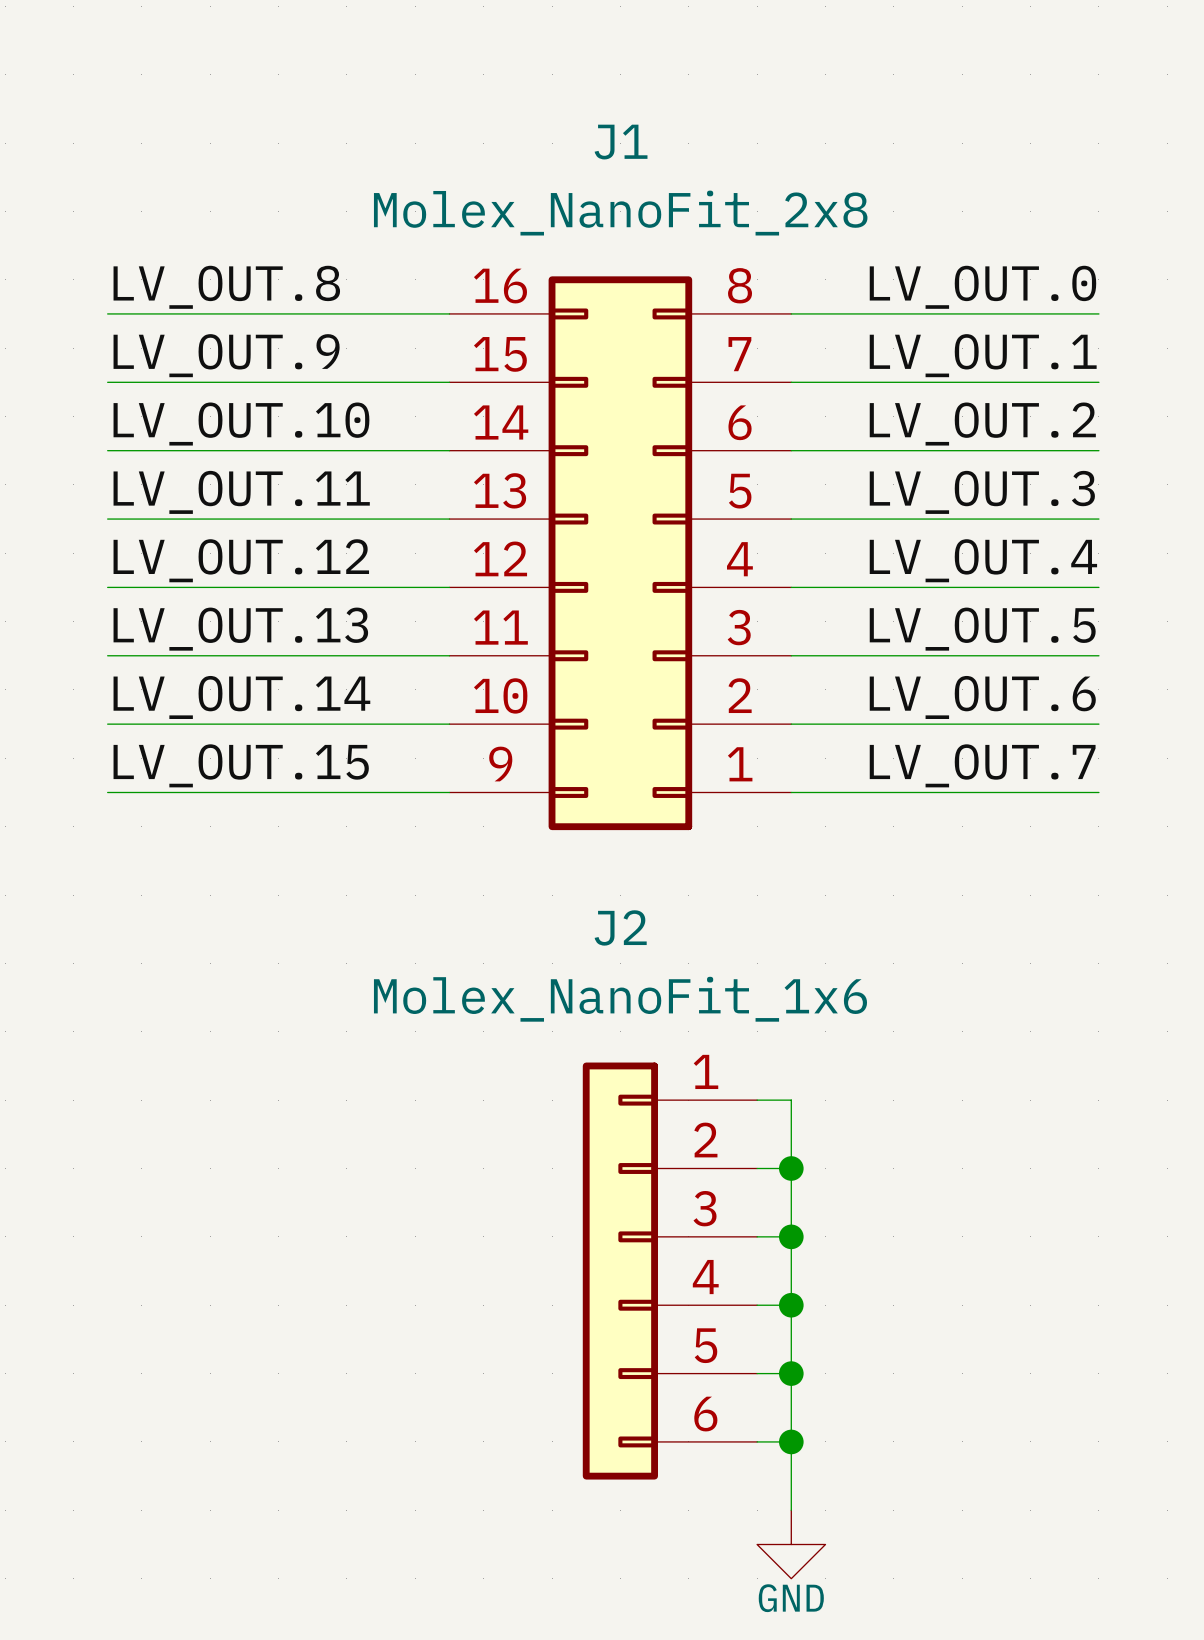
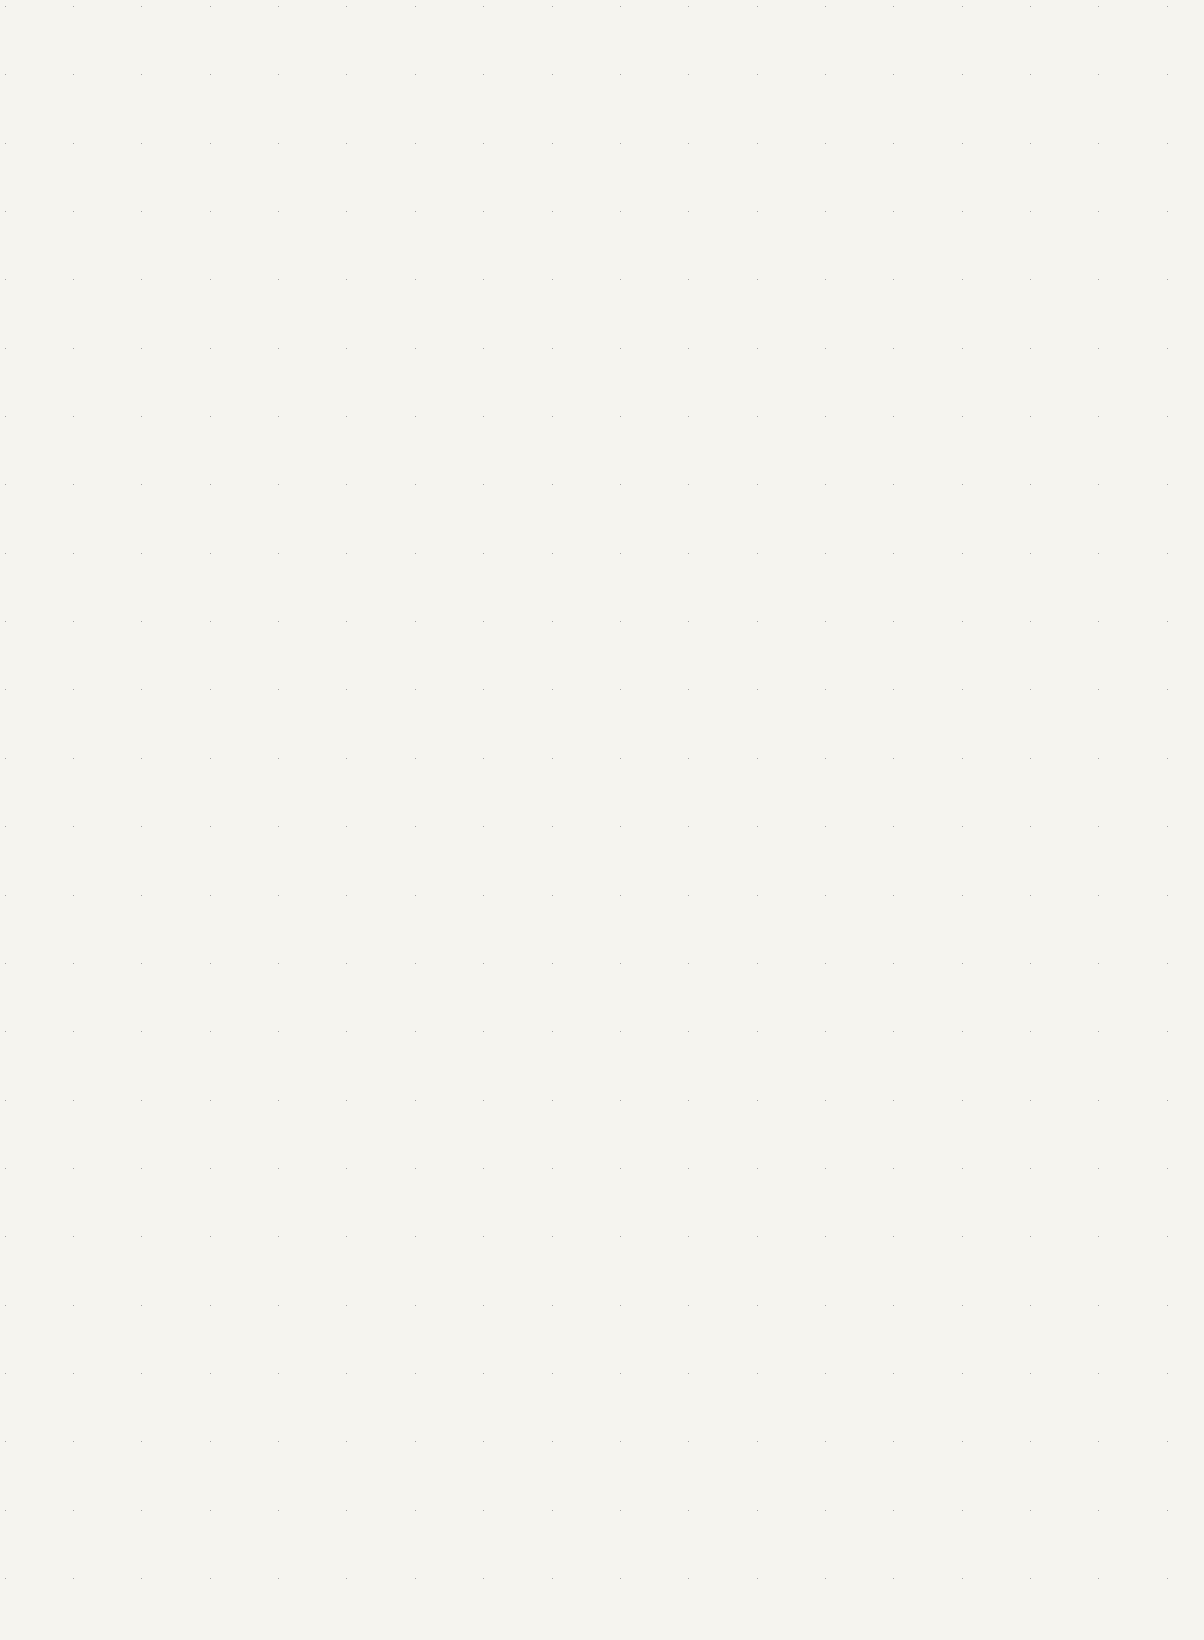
label: LV_OUT.8 (226, 287) -> none
label: LV_OUT.0 (982, 287) -> none
wire: (107, 313) (449, 313) -> none
wire: (791, 313) (1098, 313) -> none
label: LV_OUT.9 (226, 355) -> none
label: LV_OUT.1 (983, 355) -> none
wire: (107, 382) (449, 382) -> none
wire: (791, 382) (1098, 382) -> none
label: LV_OUT.10 (241, 424) -> none
label: LV_OUT.2 (982, 424) -> none
wire: (107, 450) (449, 450) -> none
wire: (791, 450) (1098, 450) -> none
label: LV_OUT.11 (241, 492) -> none
label: LV_OUT.3 (982, 492) -> none
wire: (107, 519) (449, 519) -> none
wire: (791, 519) (1098, 519) -> none
J1: Molex_NanoFit_2x8 (620, 553) -> none
label: LV_OUT.12 (241, 560) -> none
label: LV_OUT.4 (983, 560) -> none
wire: (107, 587) (449, 587) -> none
wire: (791, 587) (1098, 587) -> none
label: LV_OUT.13 (240, 629) -> none
label: LV_OUT.5 (982, 629) -> none
wire: (107, 655) (449, 655) -> none
wire: (791, 655) (1098, 655) -> none
label: LV_OUT.14 (241, 697) -> none
label: LV_OUT.6 (982, 697) -> none
wire: (107, 724) (449, 724) -> none
wire: (791, 724) (1098, 724) -> none
label: LV_OUT.15 (241, 765) -> none
label: LV_OUT.7 (982, 765) -> none
wire: (107, 792) (449, 792) -> none
wire: (791, 792) (1098, 792) -> none
wire: (757, 1100) (791, 1100) (791, 1510) -> none
wire: (757, 1168) (791, 1168) -> none
junction: (791, 1168) -> none
wire: (757, 1236) (791, 1236) -> none
junction: (791, 1236) -> none
J2: Molex_NanoFit_1x6 (669, 1271) -> none
wire: (757, 1305) (791, 1305) -> none
junction: (791, 1305) -> none
wire: (757, 1373) (791, 1373) -> none
junction: (791, 1373) -> none
wire: (757, 1441) (791, 1441) -> none
junction: (791, 1441) -> none
power symbol: GND (791, 1544) -> none

